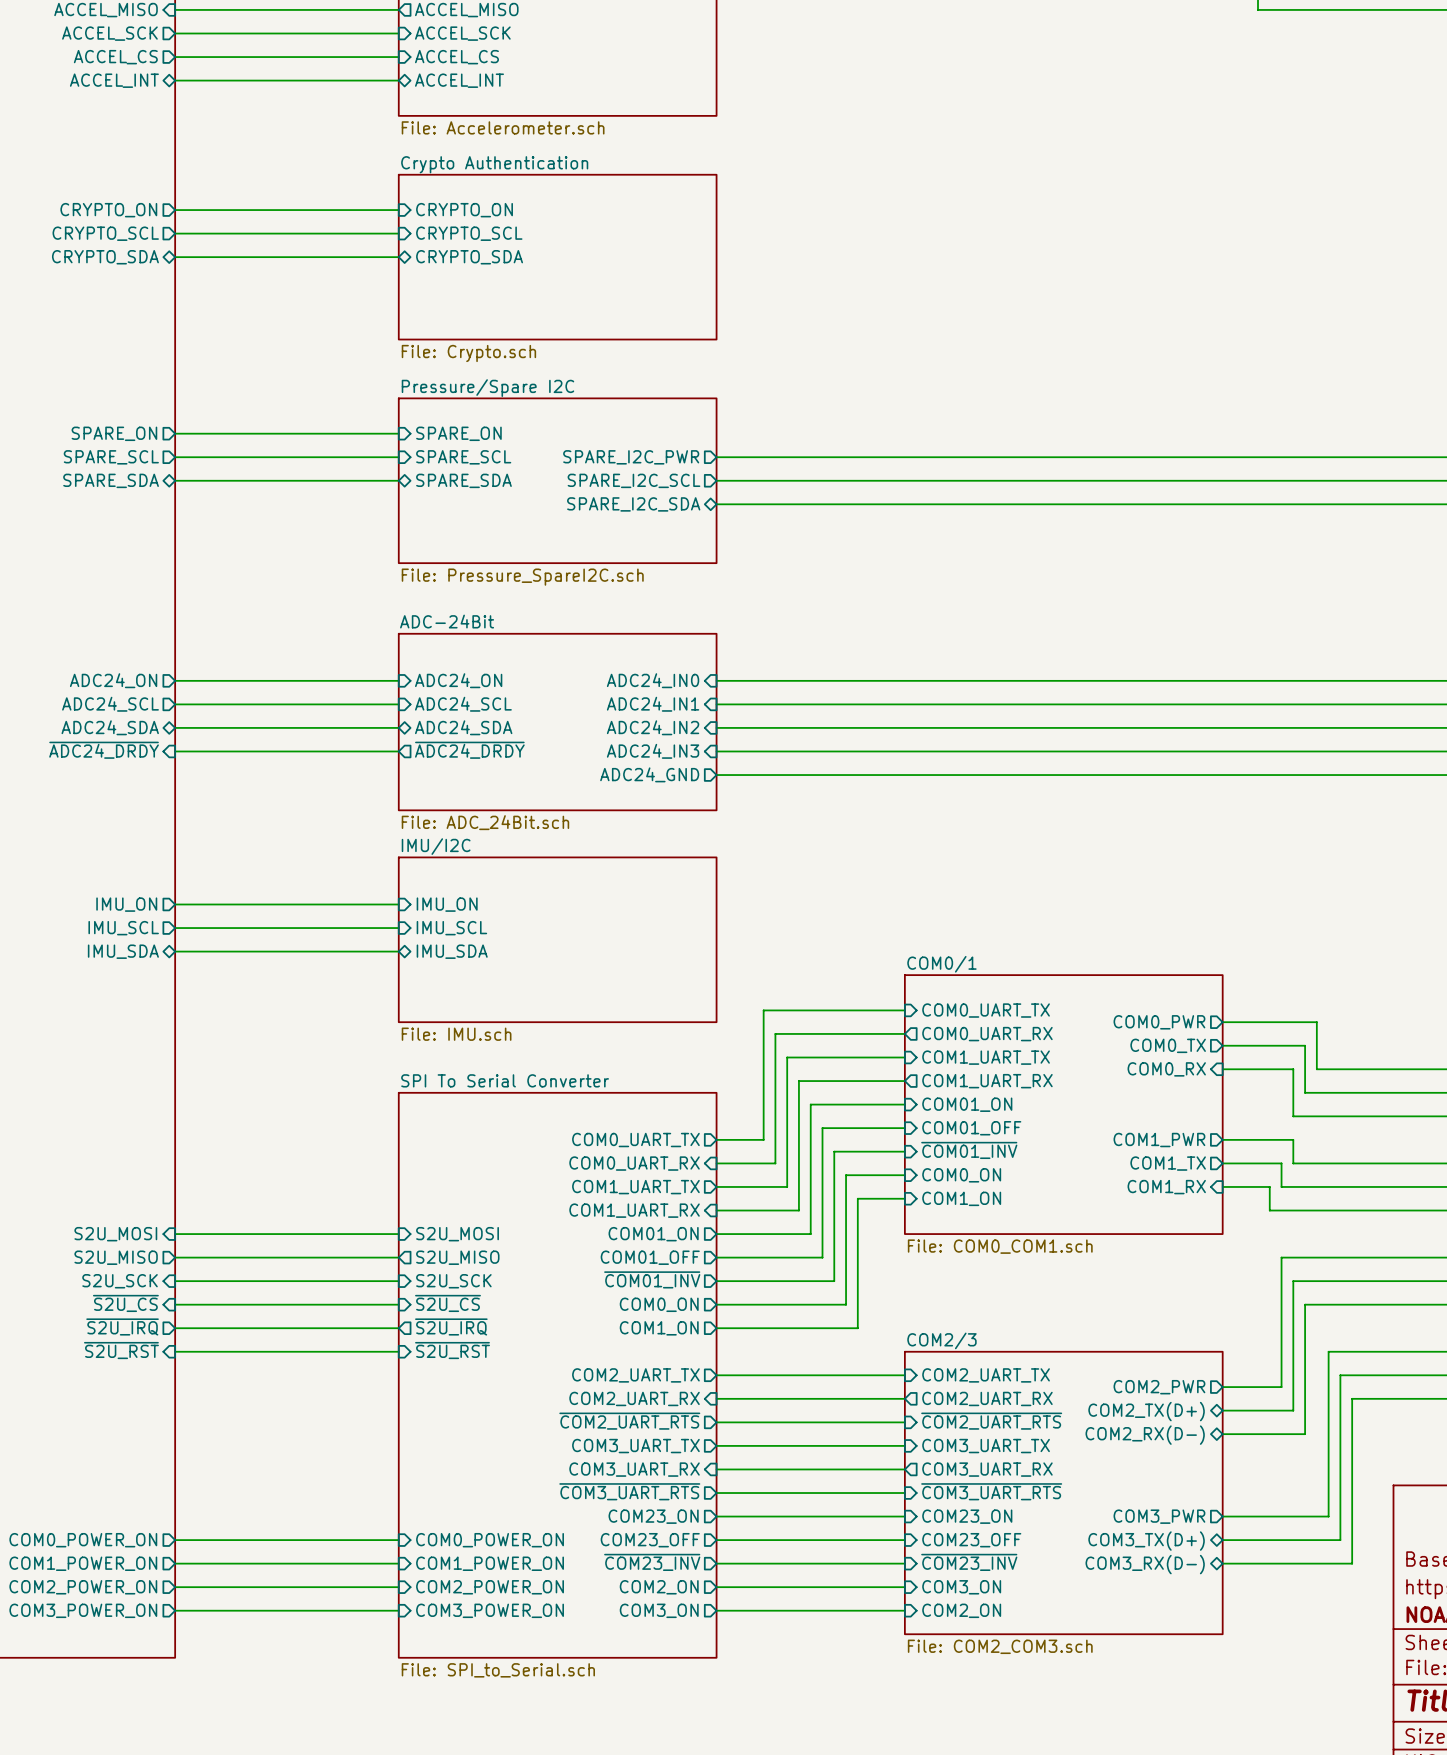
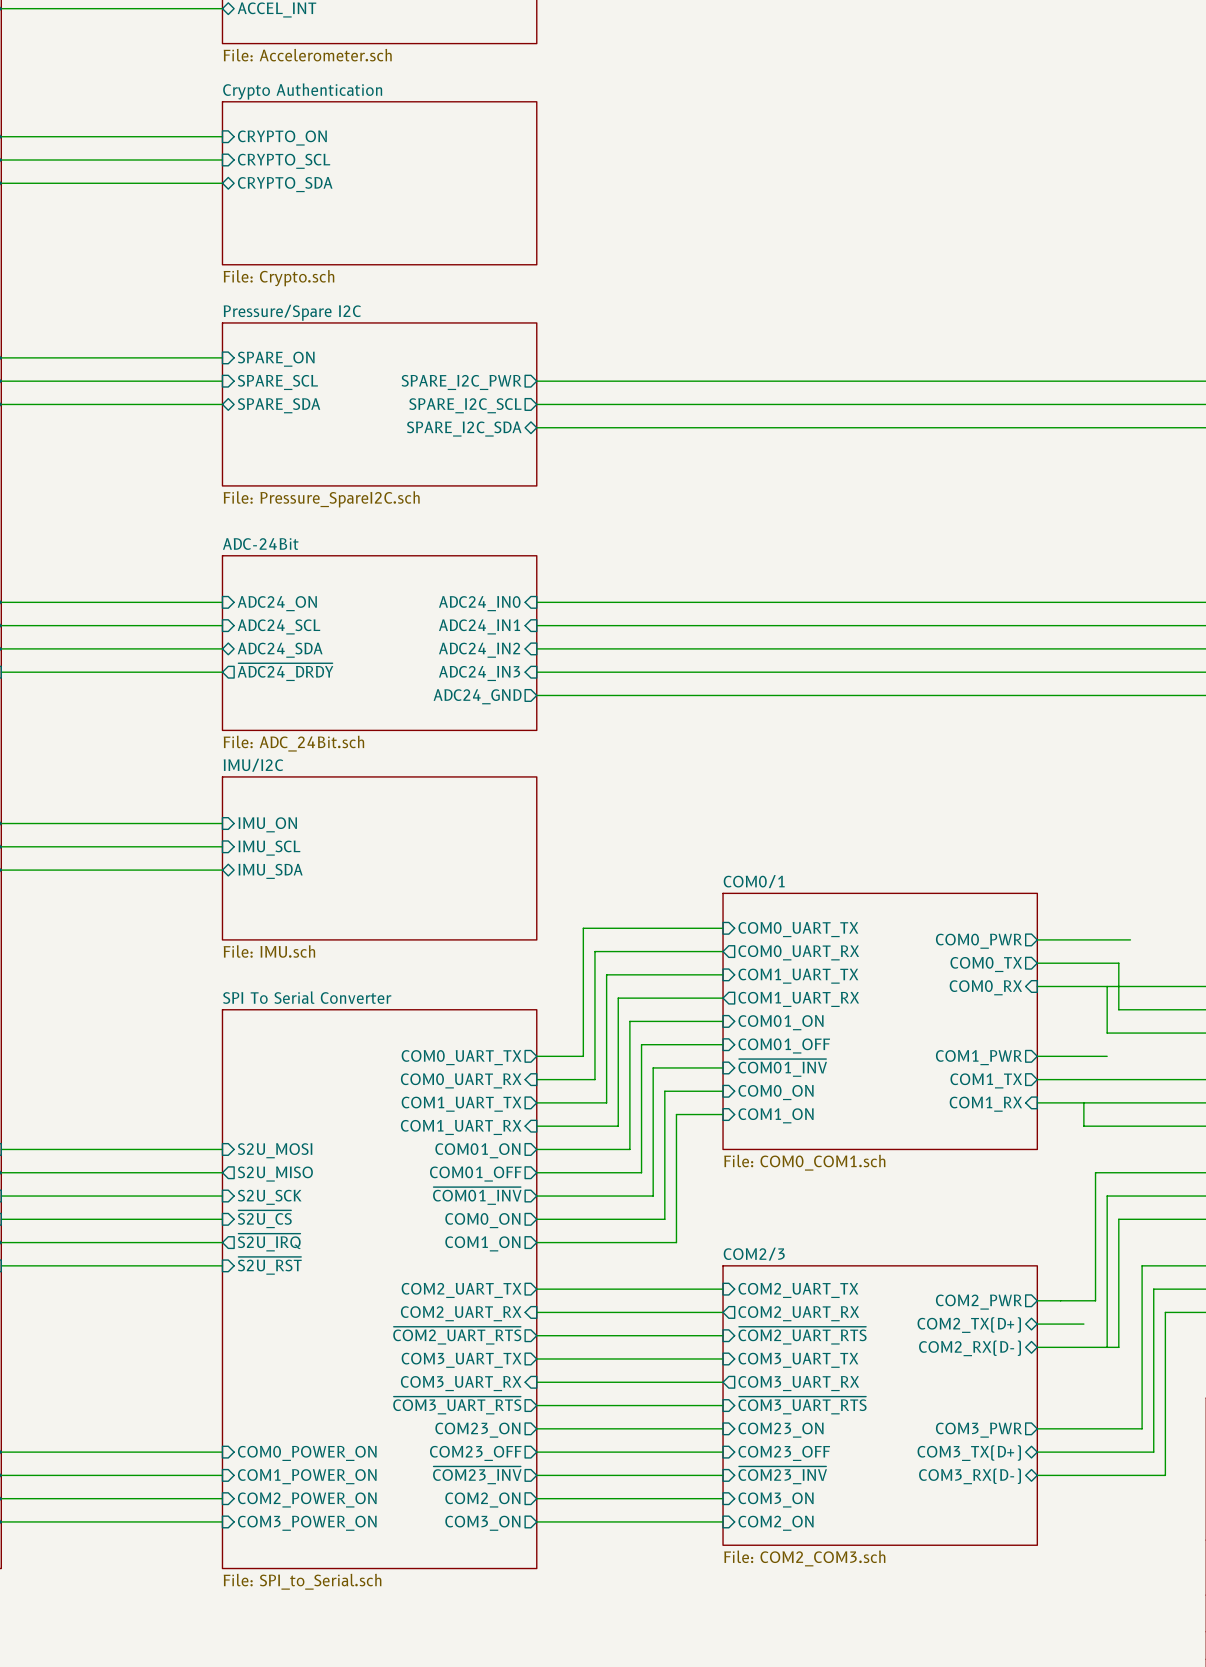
wire: (1316, 1022) (1316, 1069) -> (1107, 986) (1130, 986)
wire: (1293, 1139) (1293, 1163) -> (1095, 1079) (1107, 1079)
wire: (1281, 1163) (1281, 1186) -> (1083, 1102) (1095, 1102)
wire: (1269, 1410) (1293, 1410) -> (1107, 1347) (1107, 1324)

